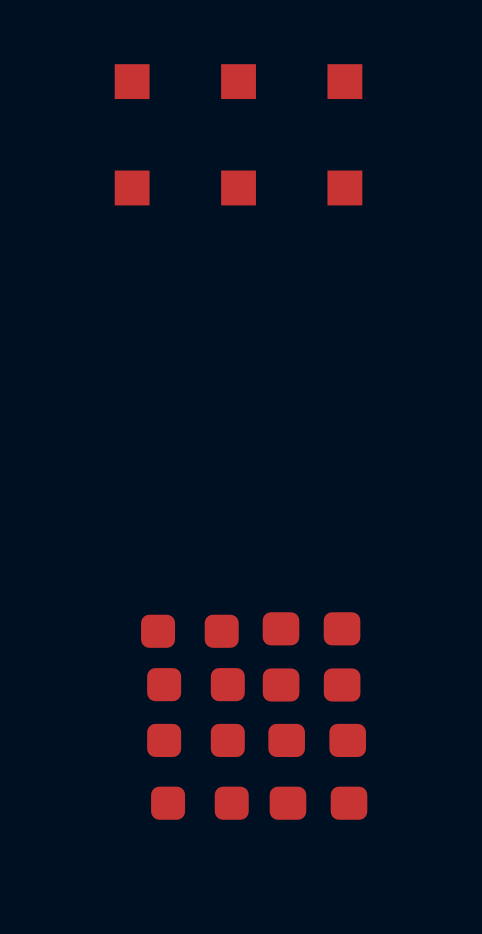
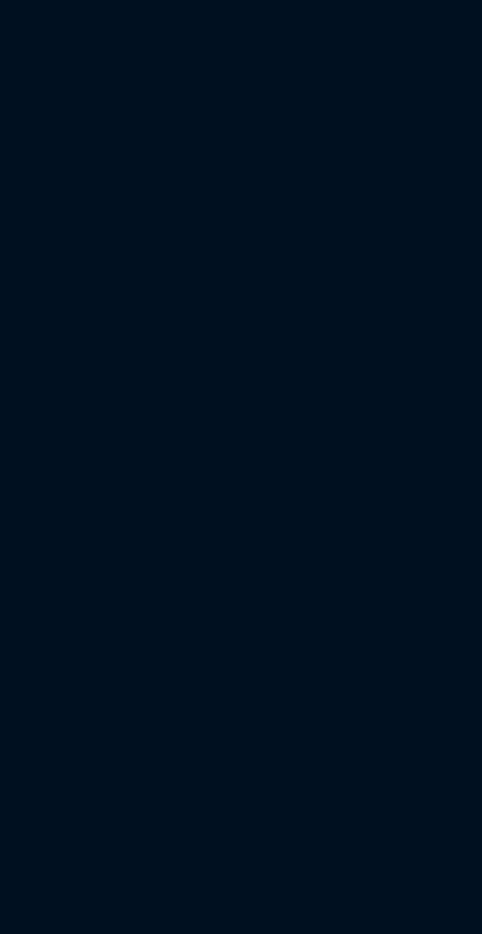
part: (132, 81) -> none
part: (238, 81) -> none
part: (344, 81) -> none
part: (132, 187) -> none
part: (238, 187) -> none
part: (344, 187) -> none
part: (311, 628) -> none
part: (189, 631) -> none
part: (195, 684) -> none
part: (311, 684) -> none
part: (195, 740) -> none
part: (317, 740) -> none
part: (199, 803) -> none
part: (318, 803) -> none

